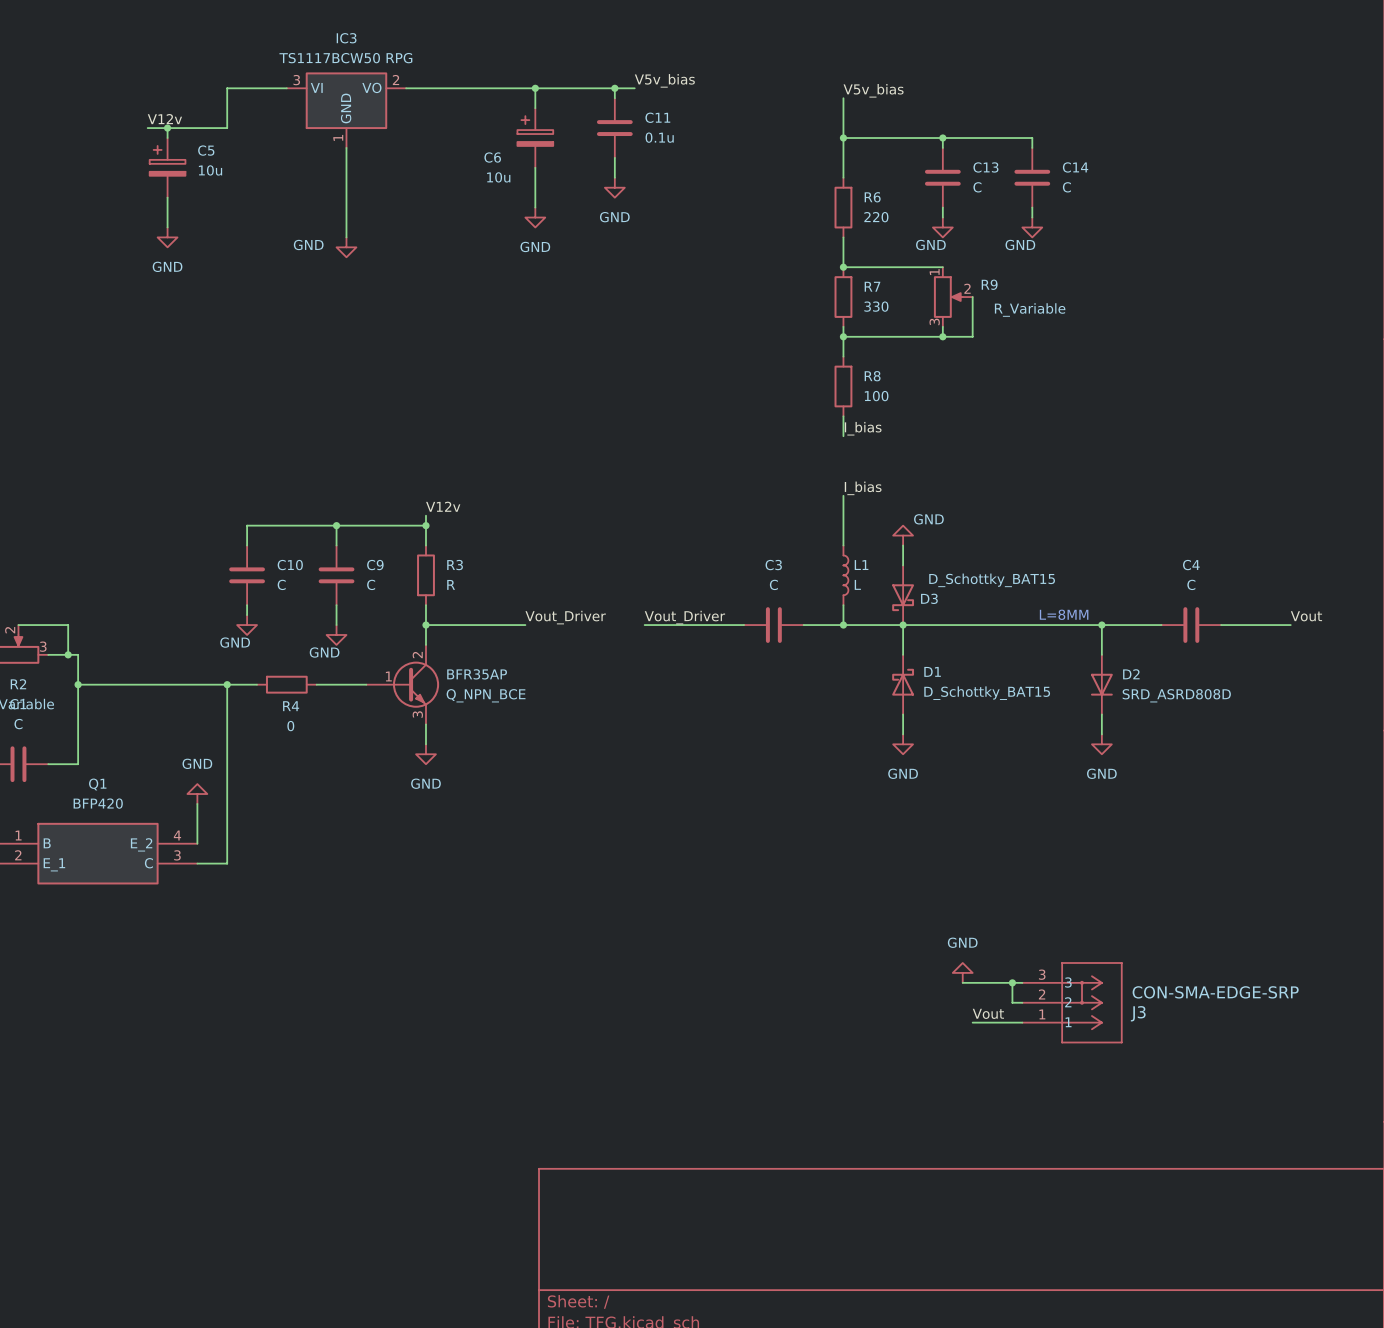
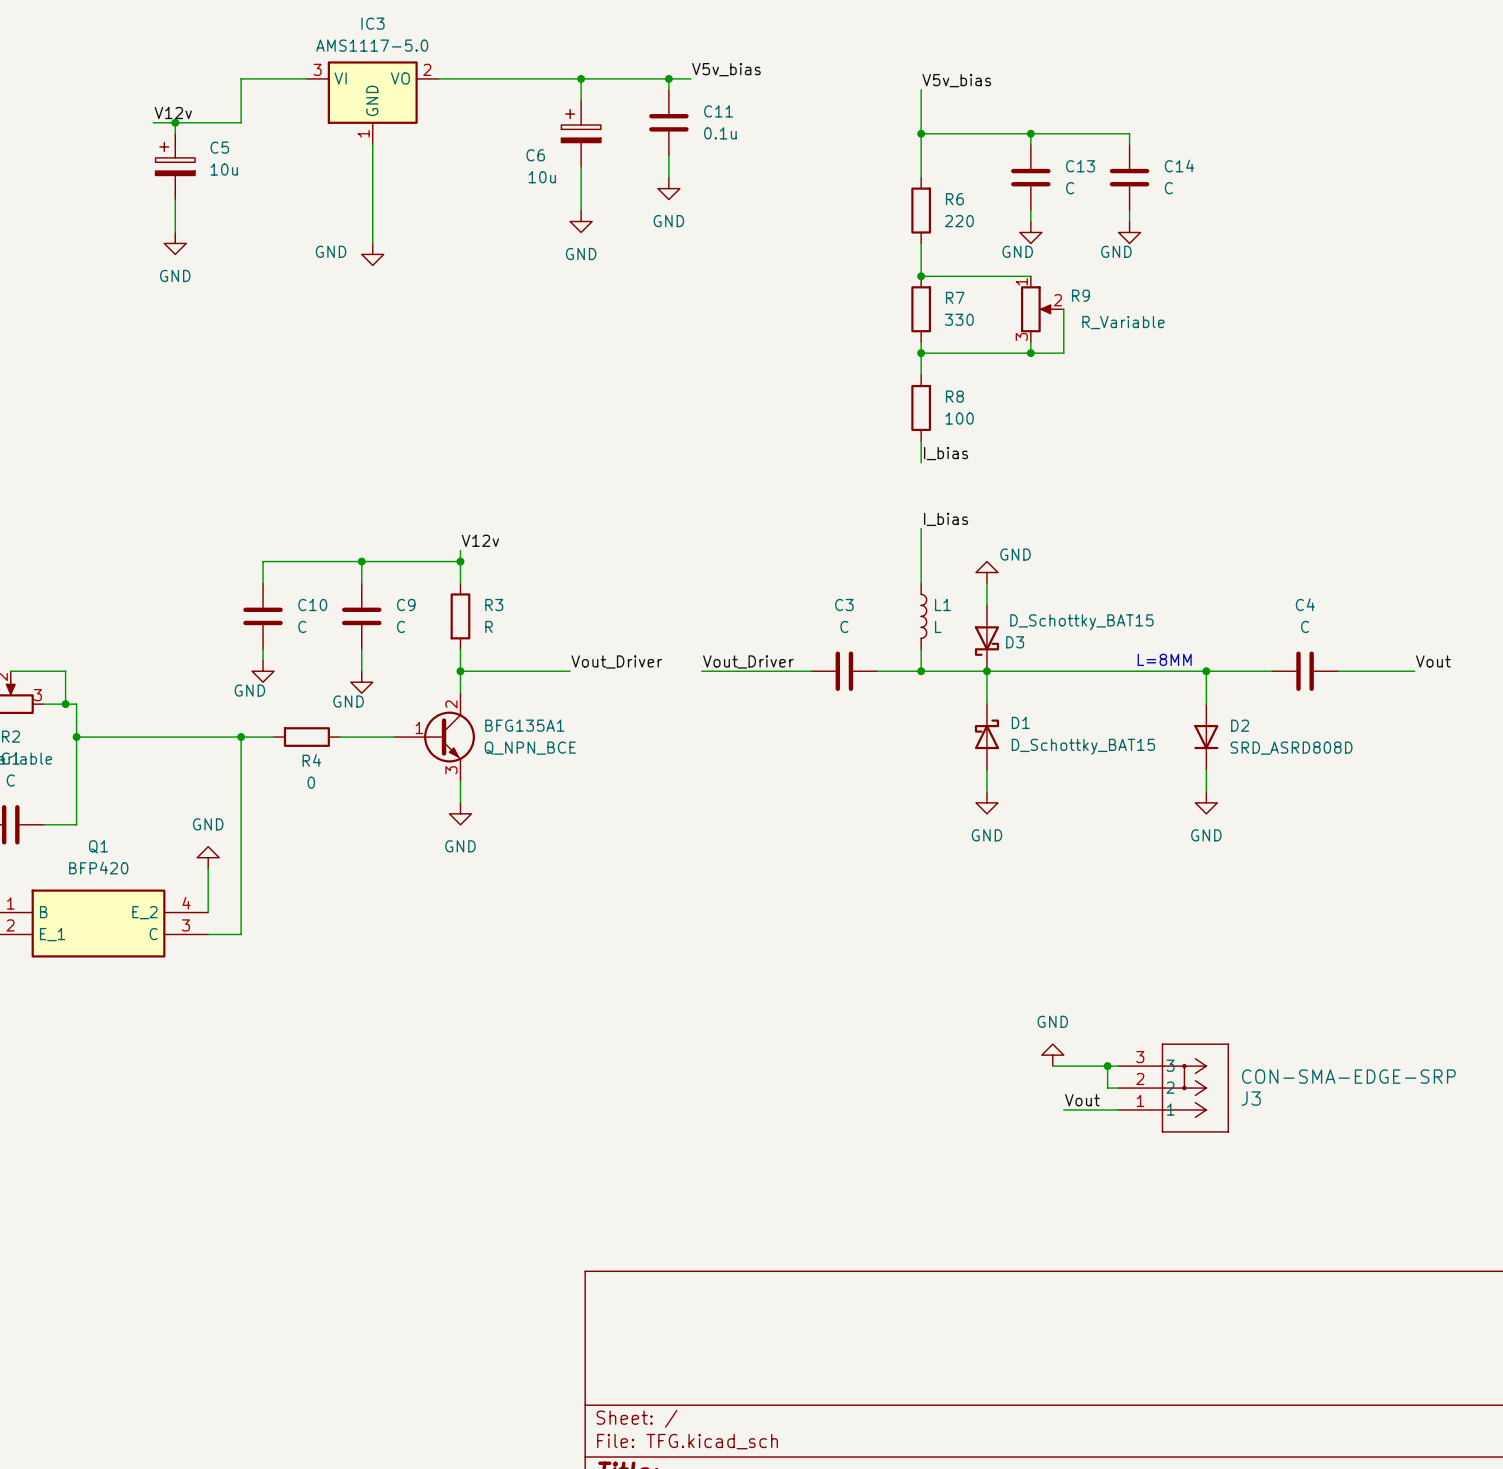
IC3 value: TS1117BCW50 RPG (345, 58) -> AMS1117-5.0 (372, 45)
BFR35AP name: BFR35AP (477, 674) -> BFG135A1 (524, 725)

